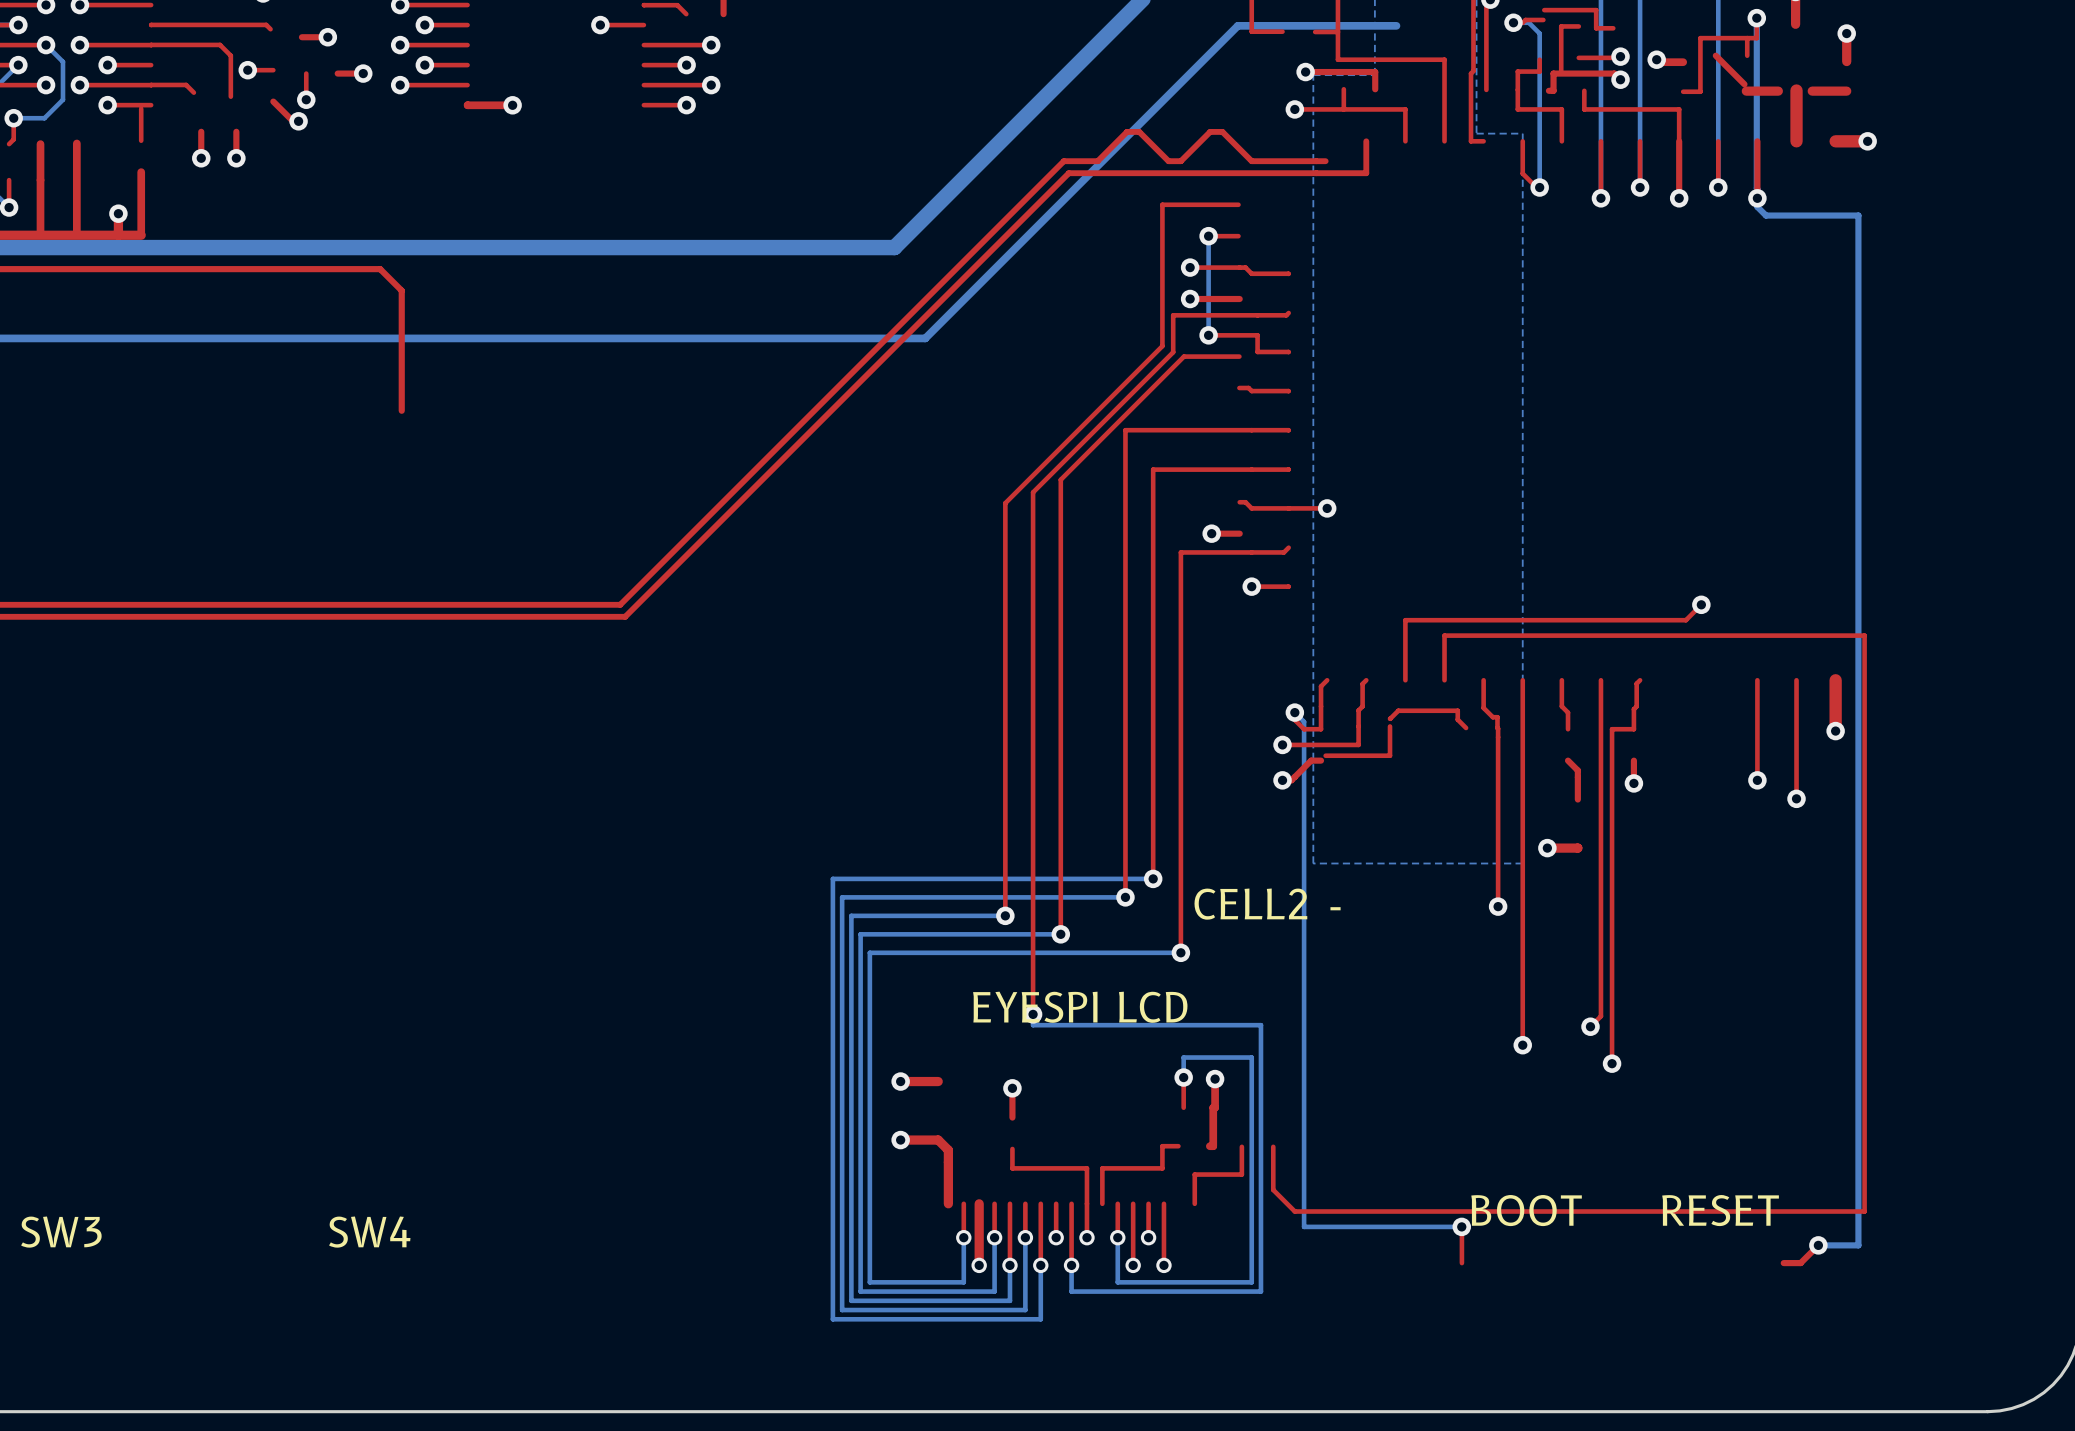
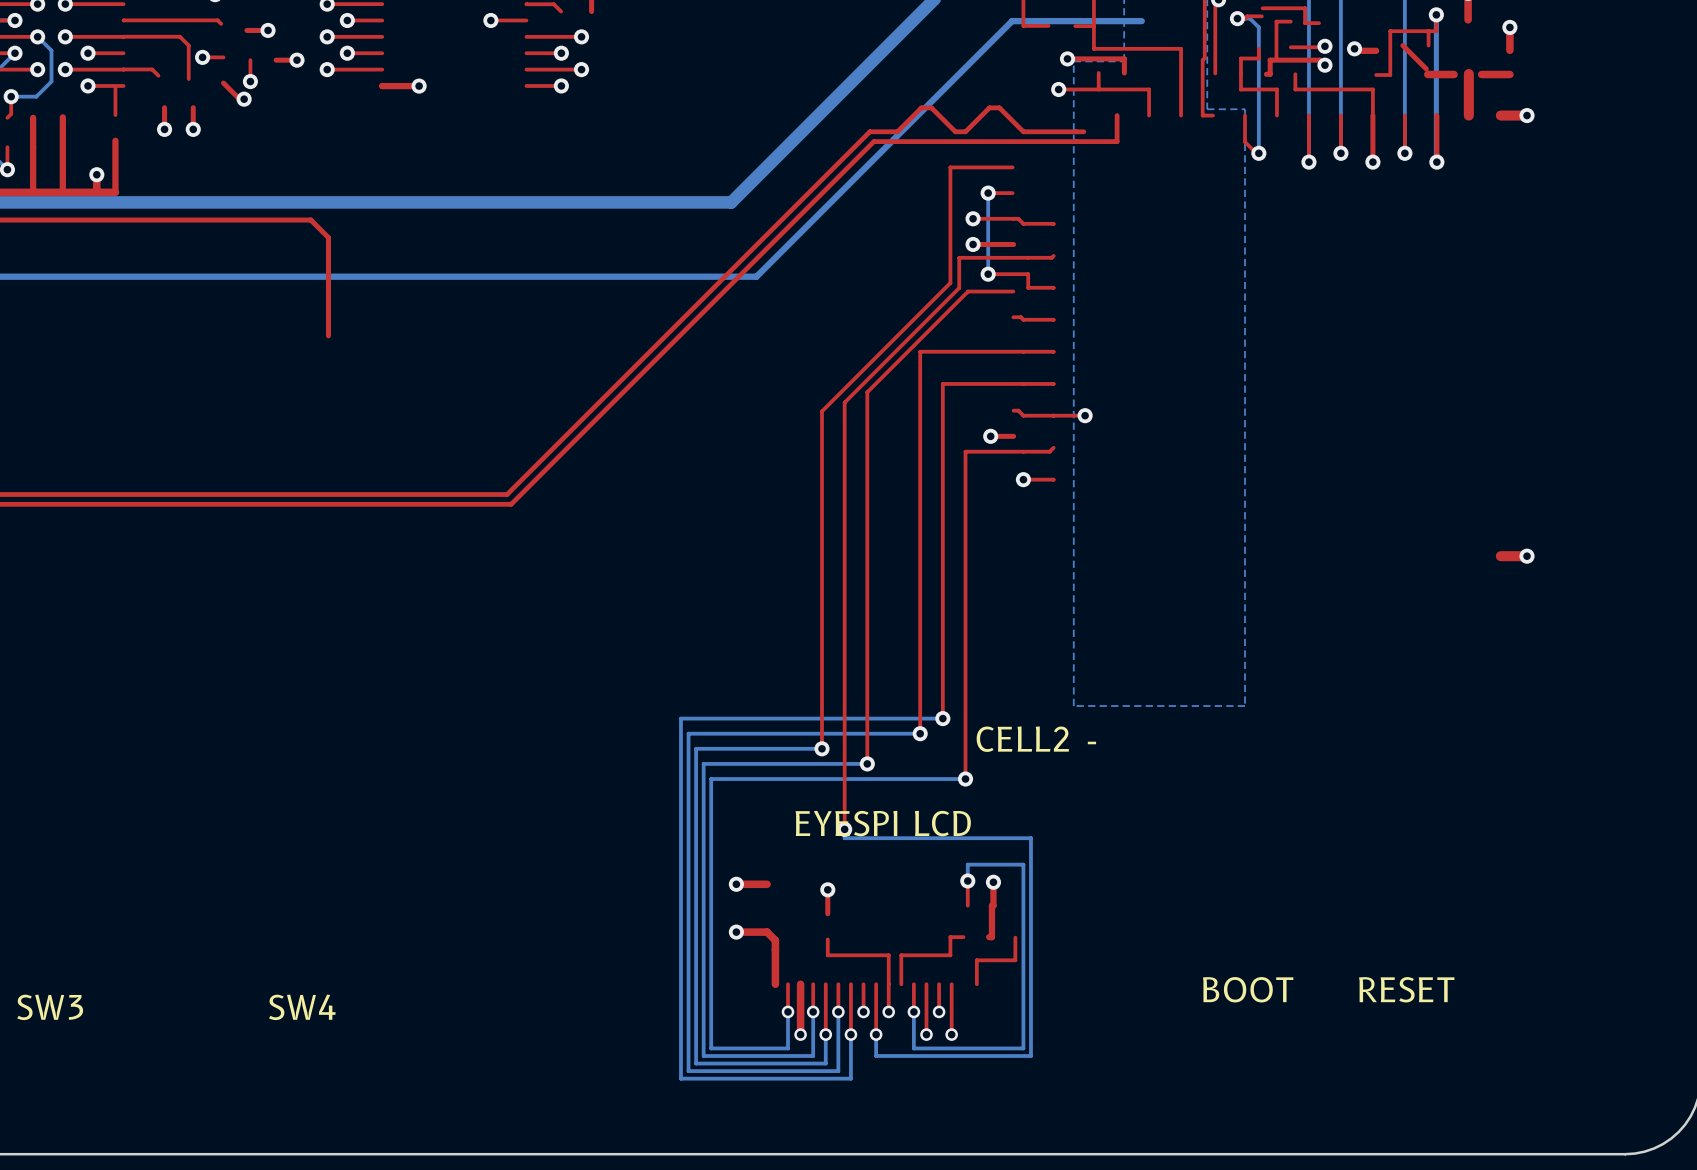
bottom track: (1757, 198) (1757, 206) (1766, 215) (1858, 215) (1858, 1245) (1818, 1245) -> none
top track: (1701, 604) (1685, 620) (1405, 620) (1405, 680) -> none
via: (1701, 604) -> none
top track: (1327, 680) (1321, 686) (1321, 729) (1304, 729) (1294, 719) (1294, 712) -> none
top track: (1366, 680) (1362, 683) (1362, 706) (1358, 710) (1358, 744) (1282, 744) -> none
top track: (1444, 680) (1444, 635) (1864, 635) (1864, 1211) (1294, 1211) (1273, 1189) (1273, 1146) -> none
top track: (1483, 680) (1483, 707) (1492, 717) (1497, 717) (1498, 906) -> none
top track: (1522, 680) (1522, 1045) -> none
top track: (1561, 680) (1561, 706) (1568, 712) (1568, 729) -> none
top track: (1600, 680) (1600, 1016) (1590, 1026) -> none
top track: (1640, 680) (1636, 683) (1633, 729) (1612, 729) (1612, 1063) -> none
top track: (1757, 680) (1757, 780) -> none
top track: (1796, 680) (1796, 798) -> none
top track: (1835, 680) (1835, 731) -> (1500, 556) (1527, 556)
bottom track: (1294, 712) (1304, 721) (1304, 1226) (1461, 1226) -> none
via: (1294, 712) -> none
top track: (1390, 718) (1398, 710) (1457, 710) (1457, 719) (1466, 728) -> none
top track: (1390, 726) (1390, 755) (1325, 755) -> none
via position: (1835, 731) -> (1527, 556)
via: (1282, 744) -> none
top track: (1321, 760) (1311, 760) (1291, 780) (1282, 780) -> none
top track: (1568, 760) (1577, 770) (1577, 799) -> none
top track: (1633, 760) (1633, 783) -> none
via: (1282, 780) -> none
via: (1757, 780) -> none
via: (1633, 783) -> none
via: (1796, 798) -> none
top track: (1547, 848) (1577, 848) -> none
via: (1547, 848) -> none
via: (1498, 906) -> none
via: (1590, 1026) -> none
via: (1522, 1045) -> none
via: (1612, 1063) -> none
via: (1461, 1226) -> none
top track: (1461, 1227) (1461, 1263) -> none
top track: (1818, 1245) (1800, 1263) (1783, 1263) -> none
via: (1818, 1245) -> none

